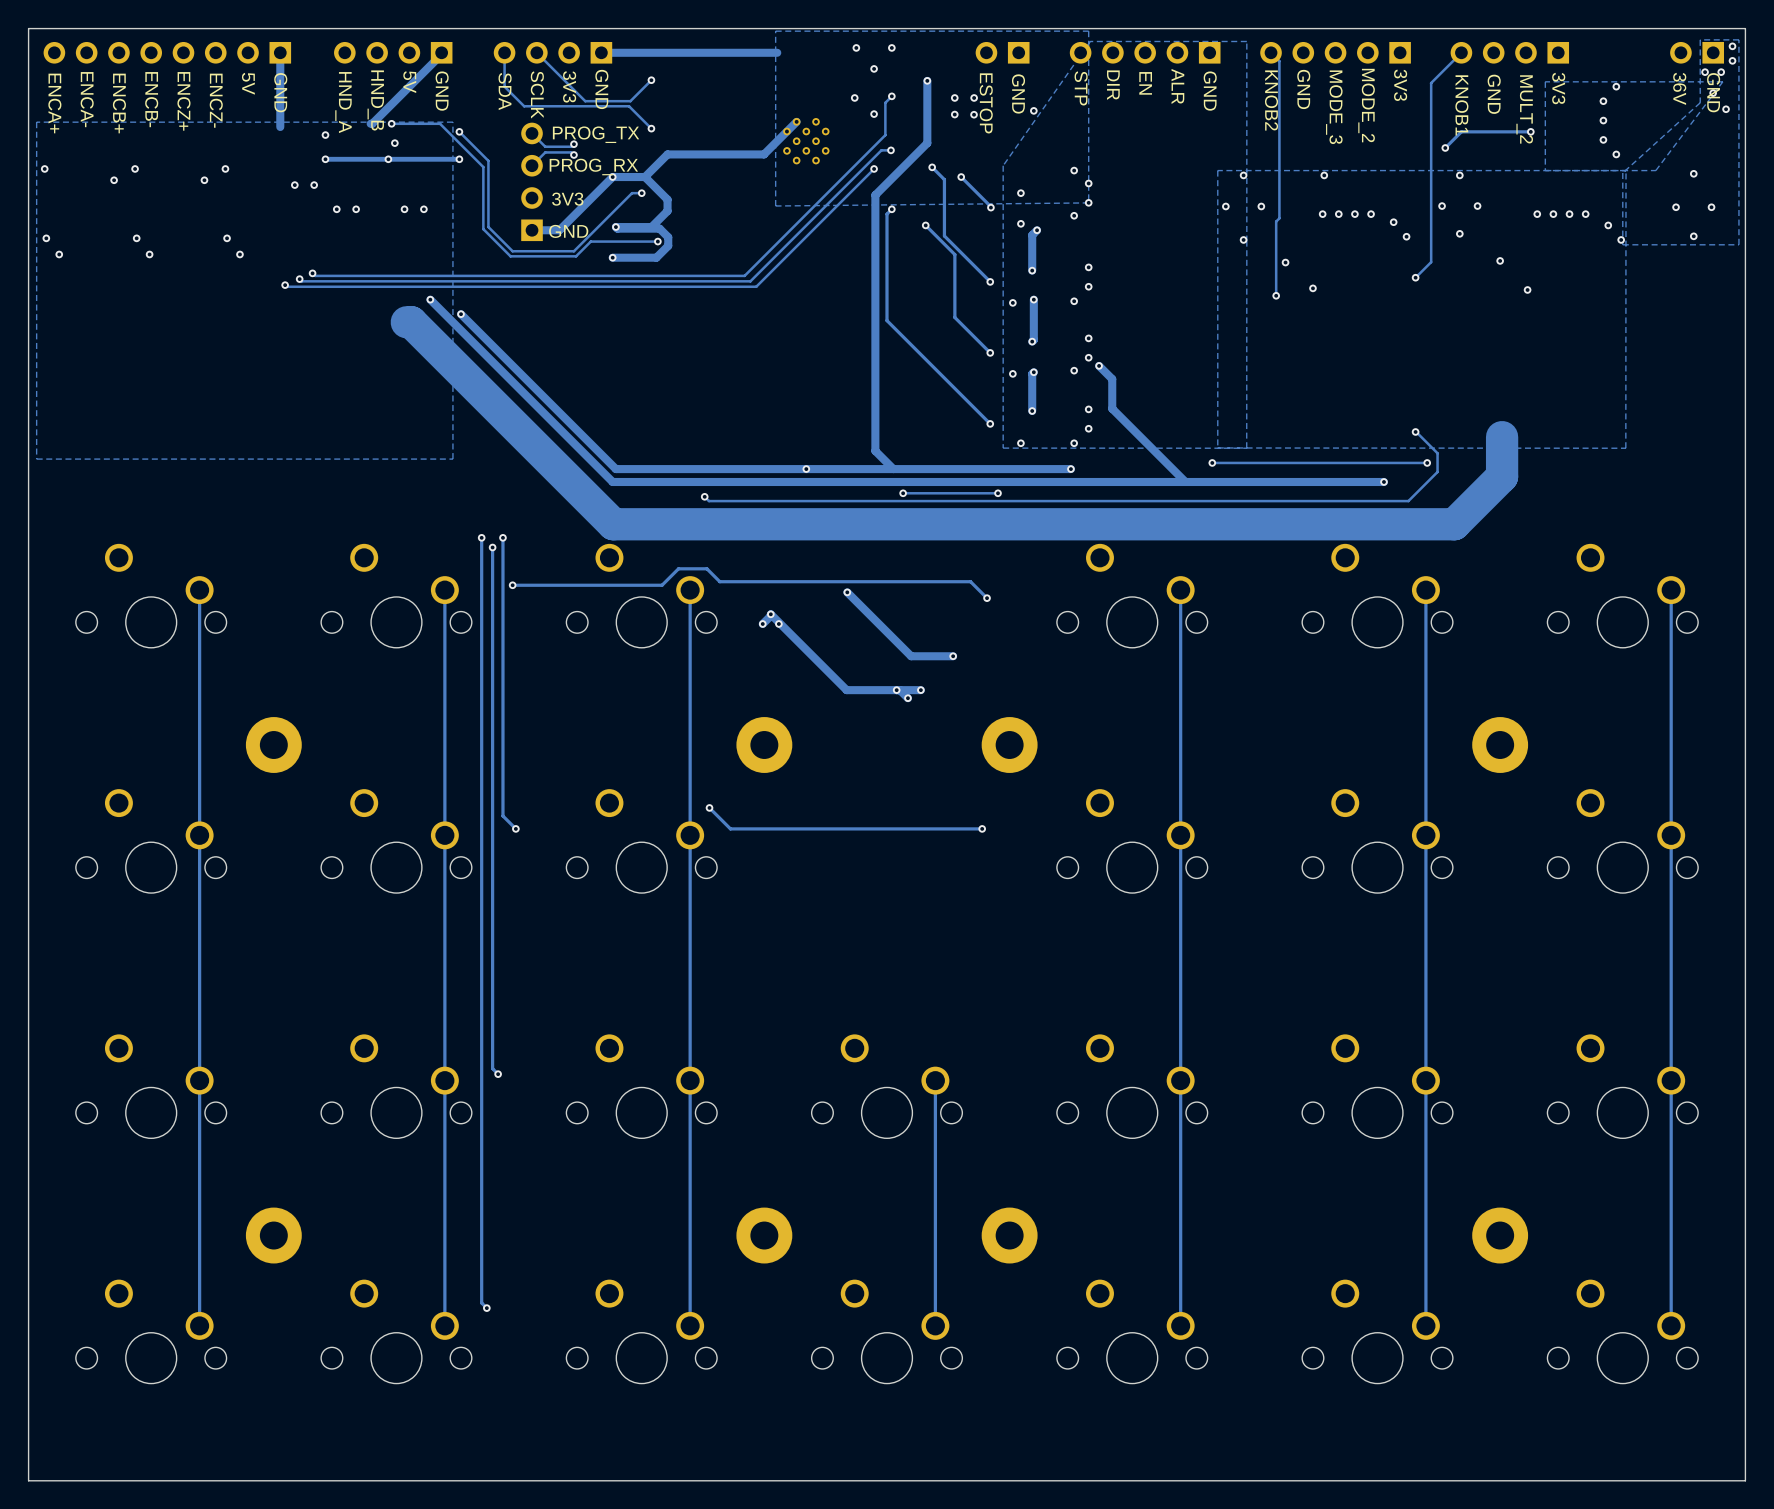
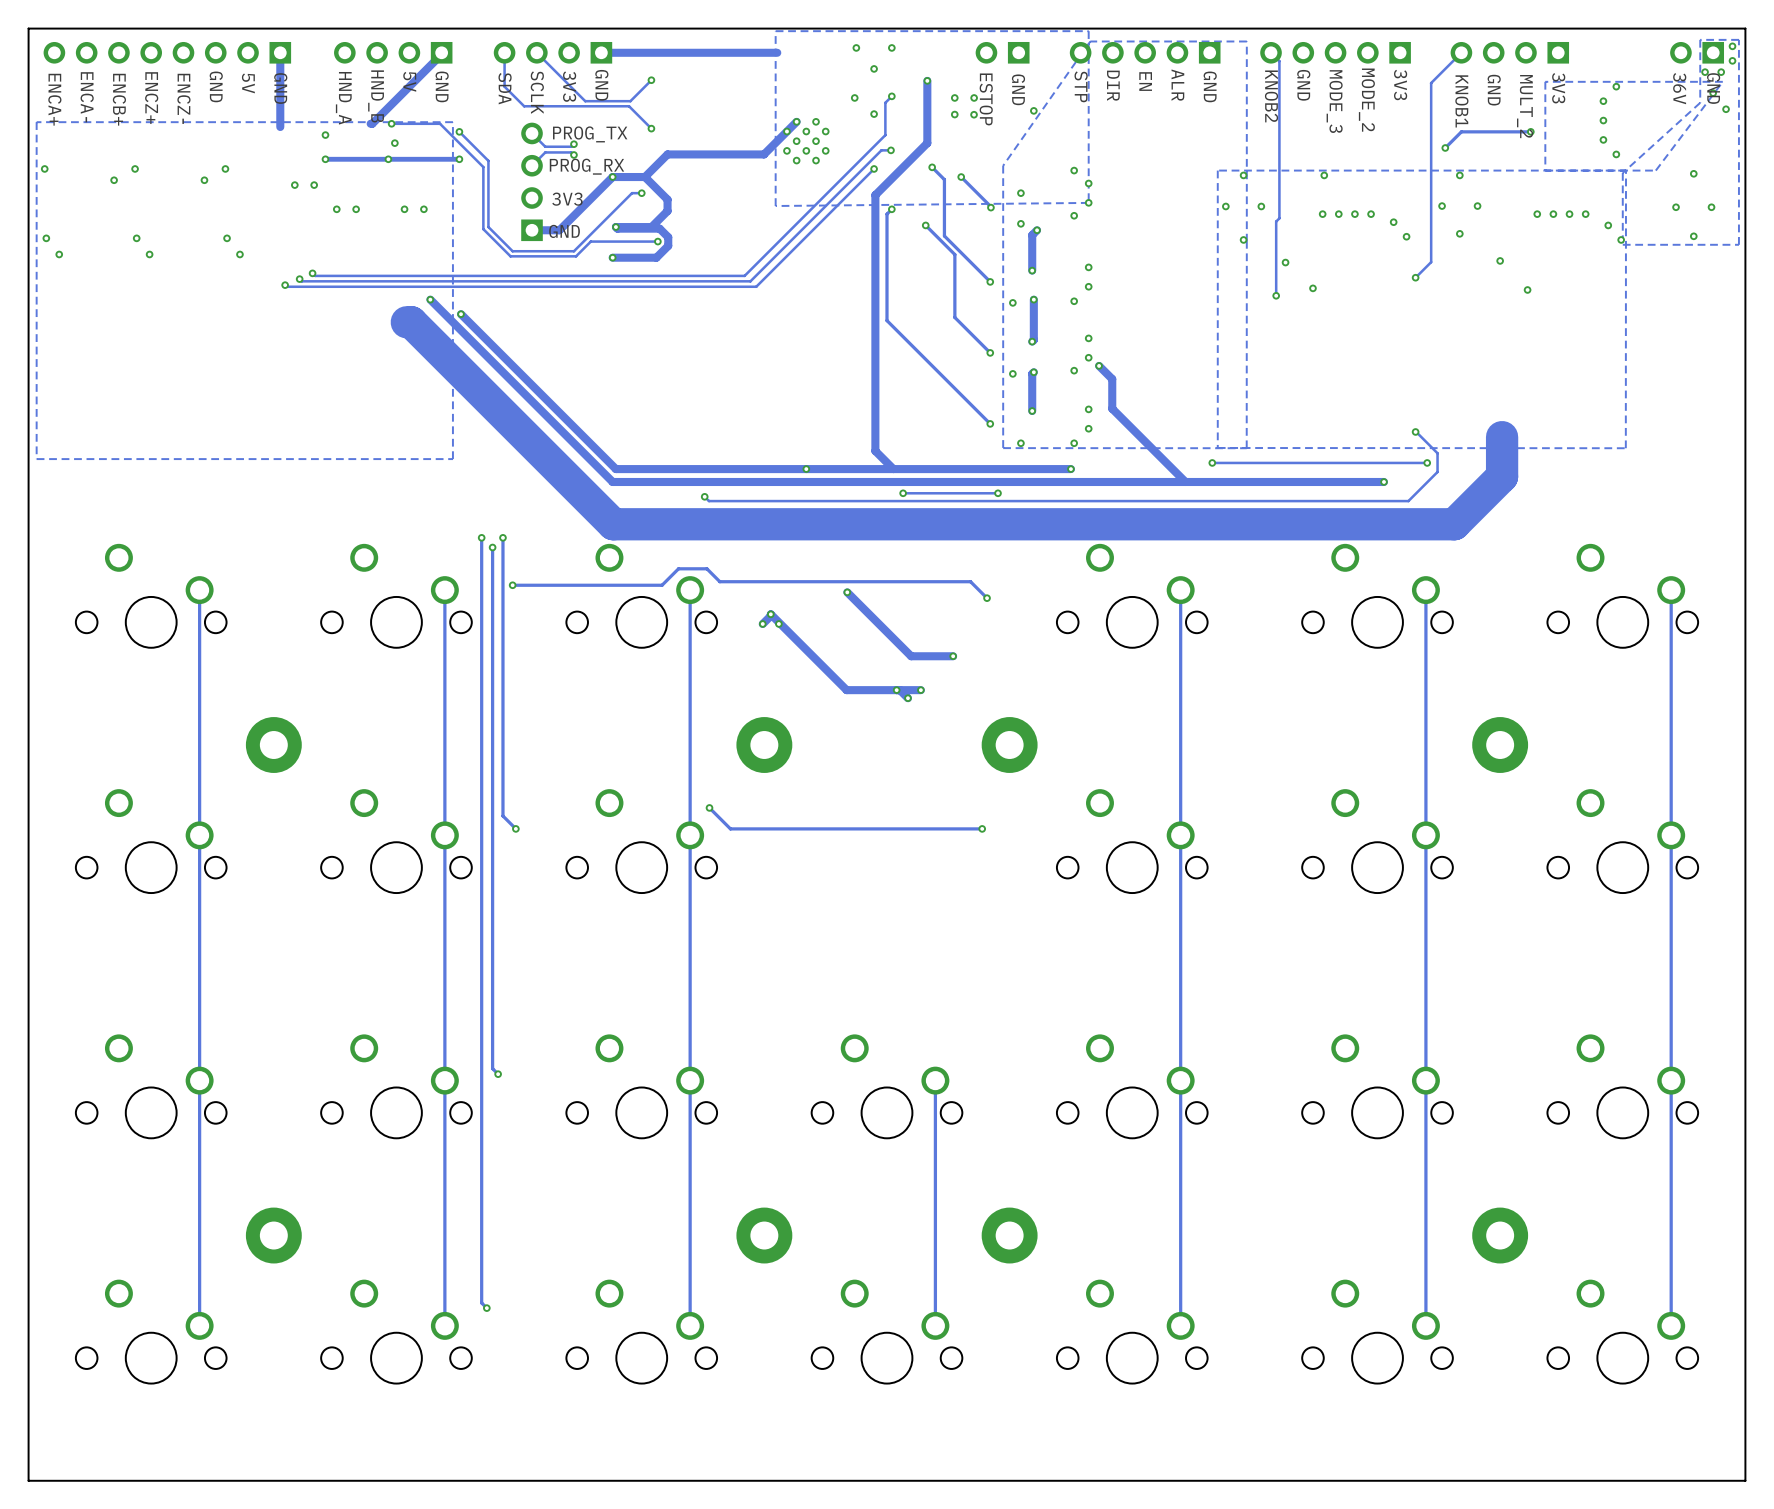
text: none -> GND (216, 86)
text: ENCB- (151, 99) -> ENCZ+ (151, 98)
text position: ENCZ- (216, 100) -> ENCZ- (183, 98)
text: ENCZ+ (183, 101) -> none

